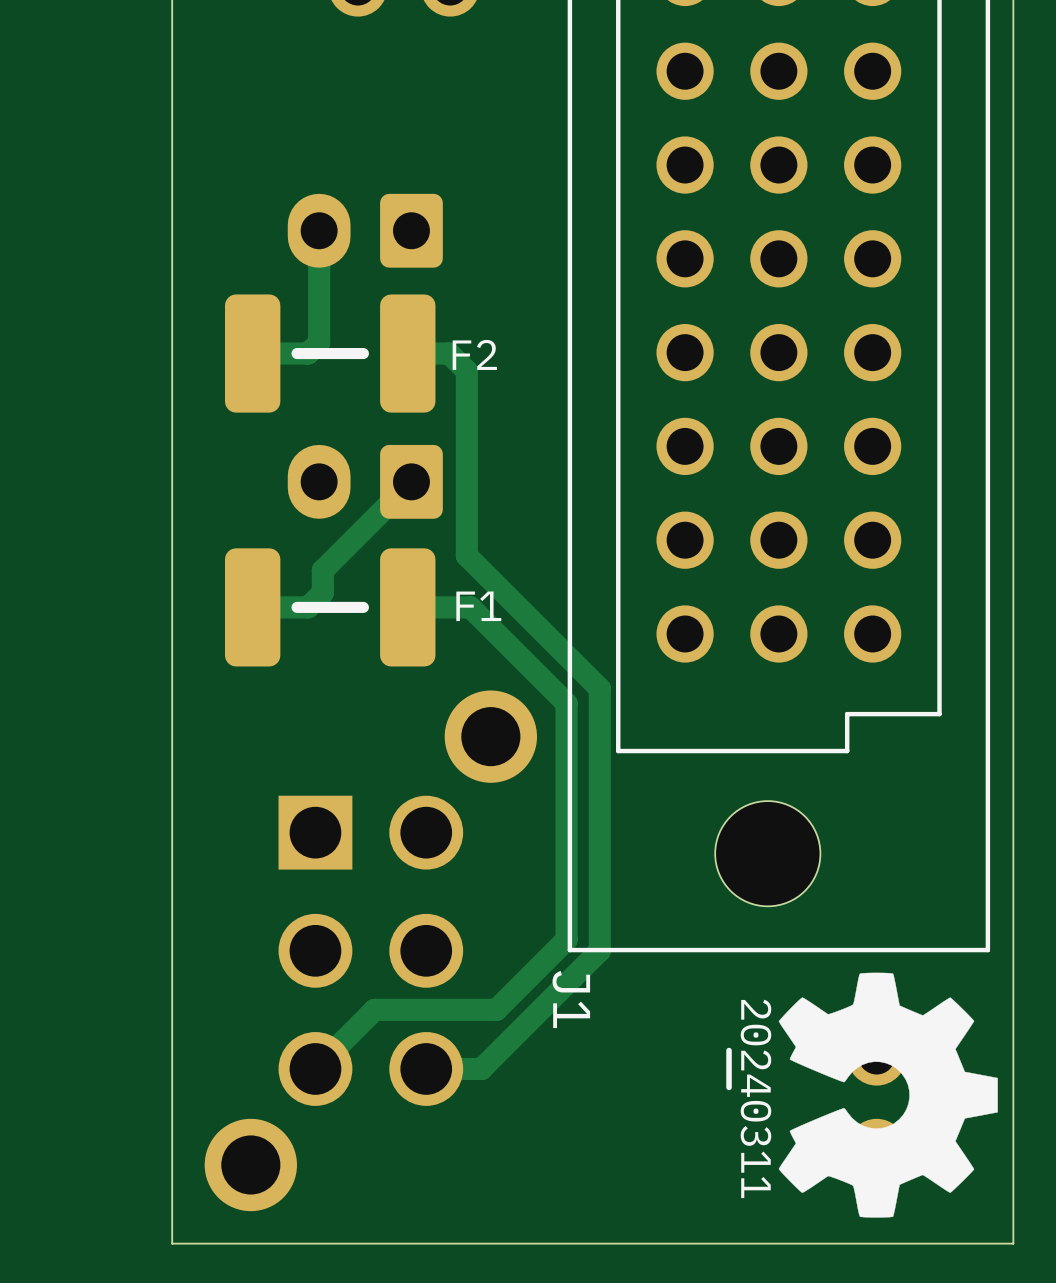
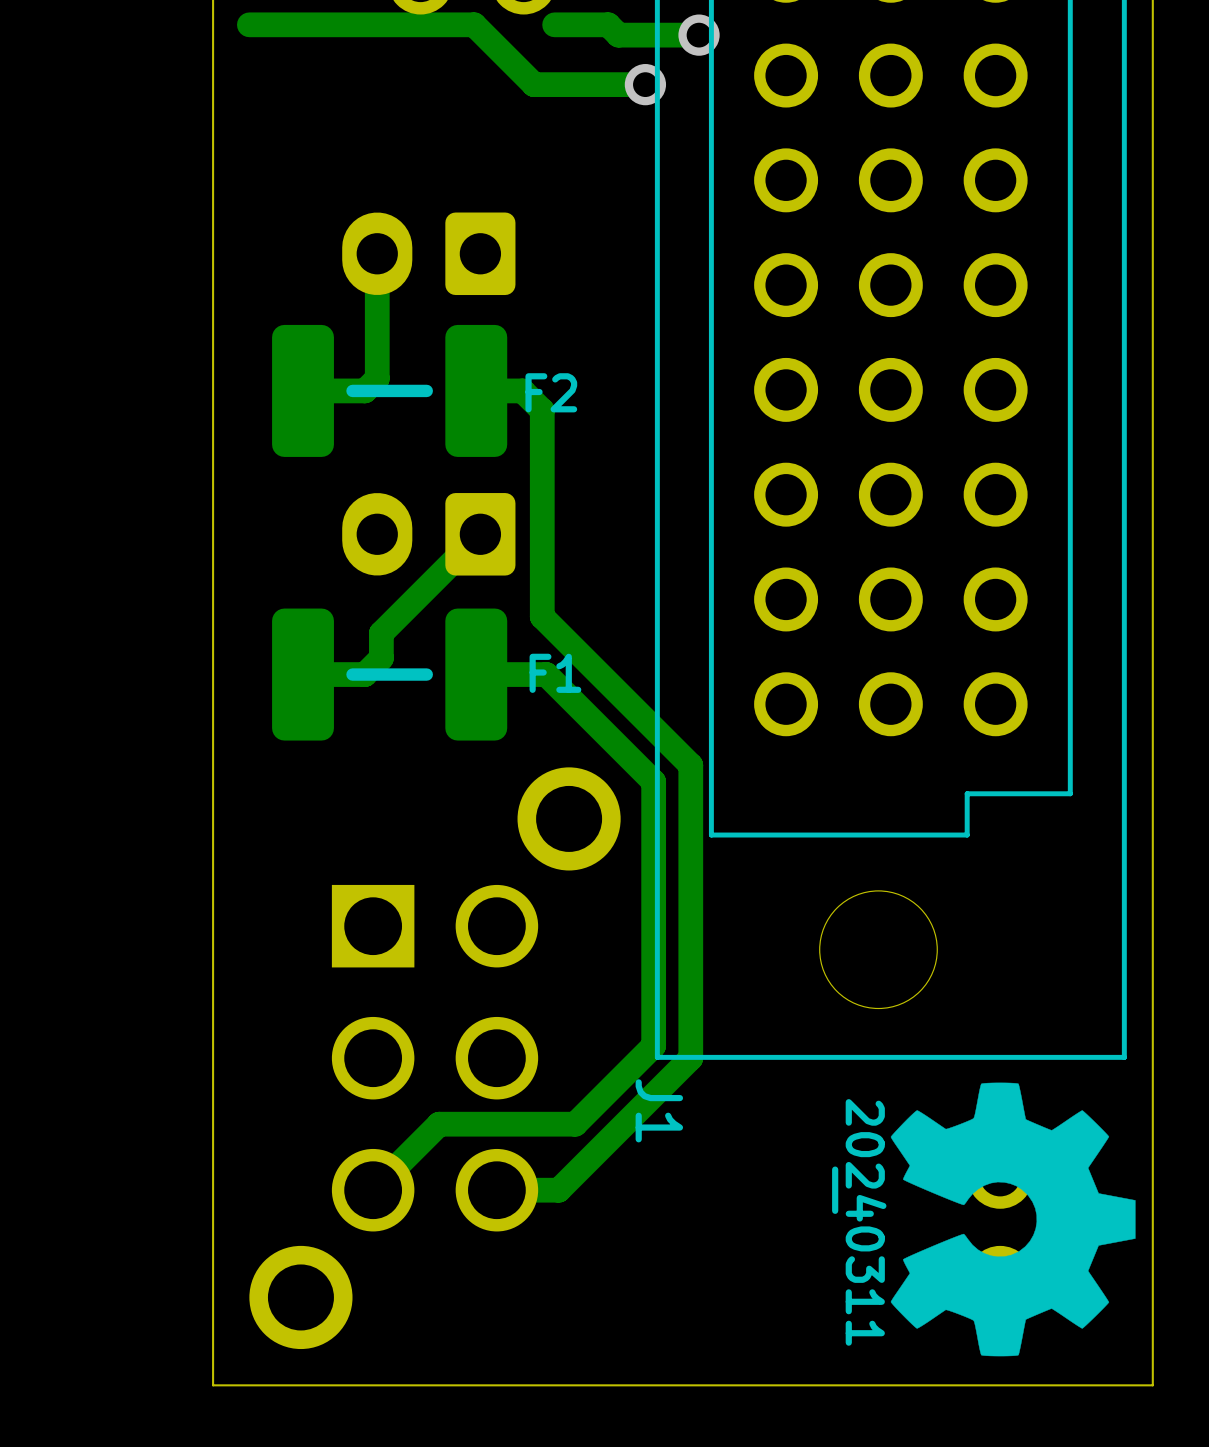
track: none -> (249, 24) (474, 24) (534, 84) (645, 84)
track: none -> (554, 24) (608, 24) (618, 35) (703, 35)
via: none -> (699, 35)
via: none -> (645, 84)

